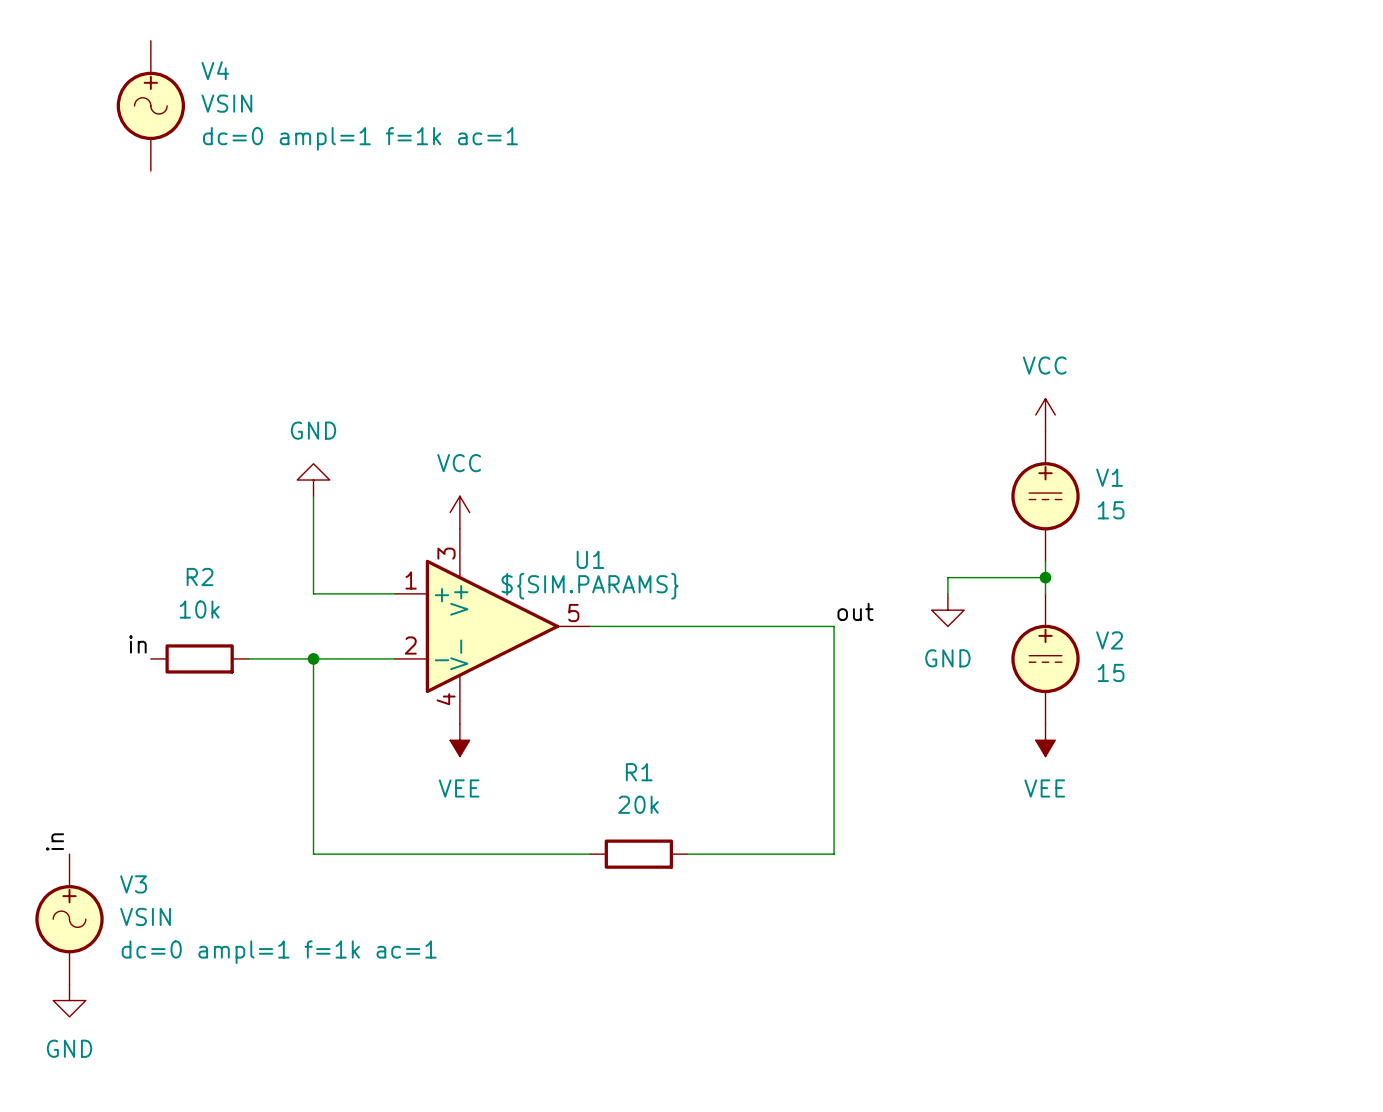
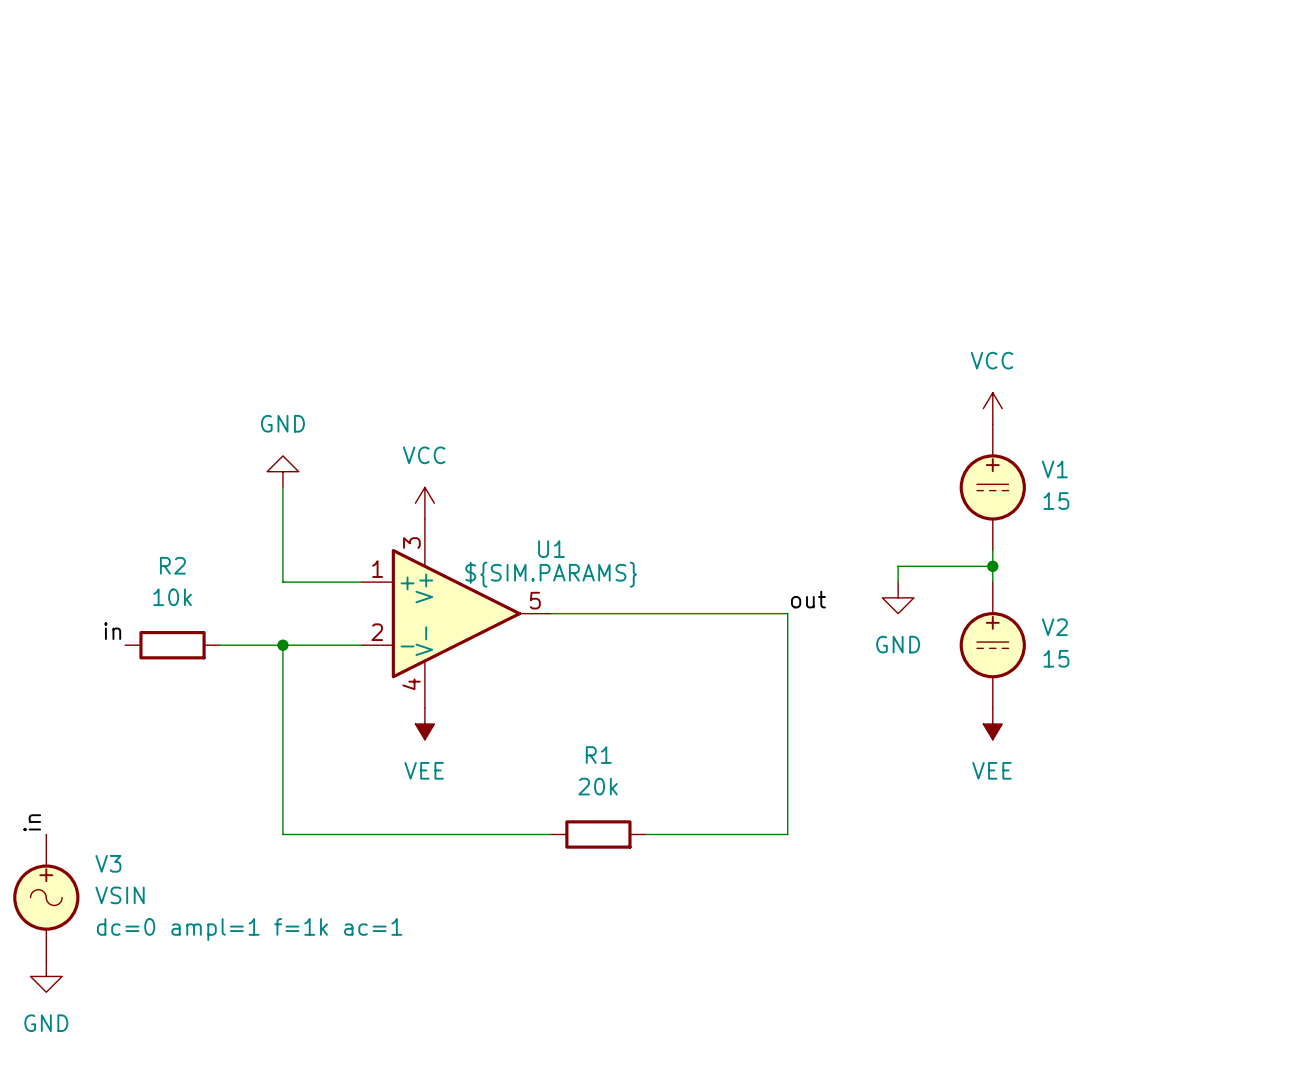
V4: VSIN (150, 105) -> none

